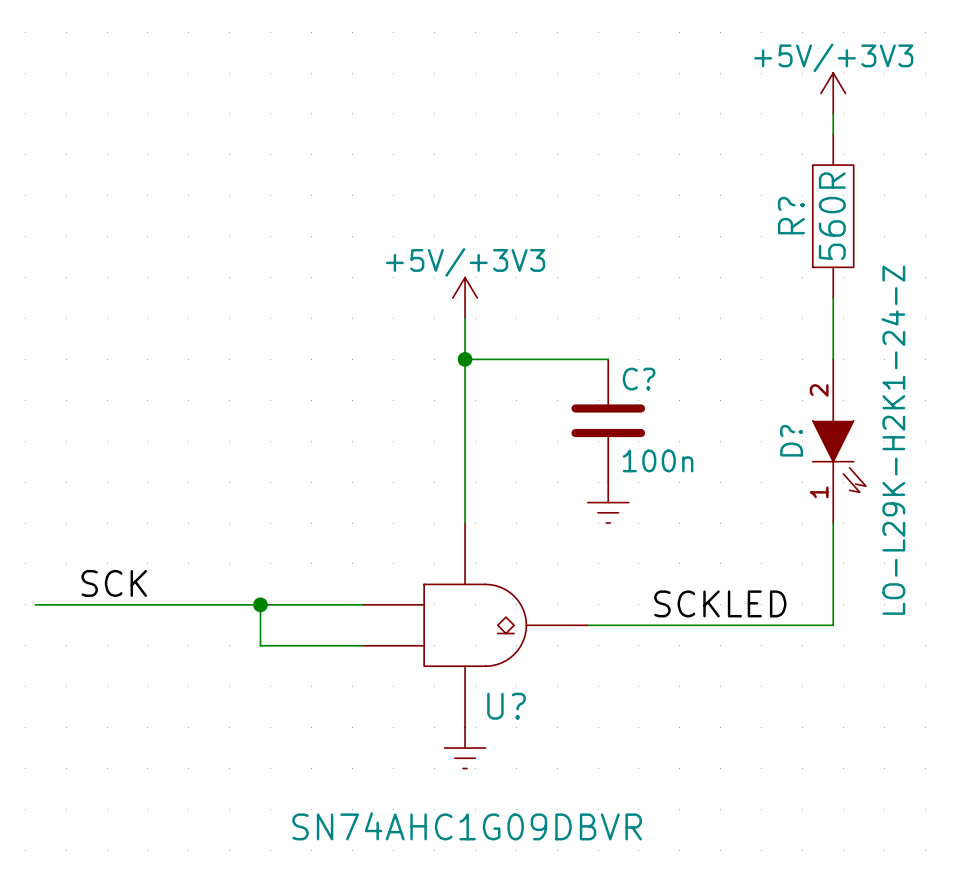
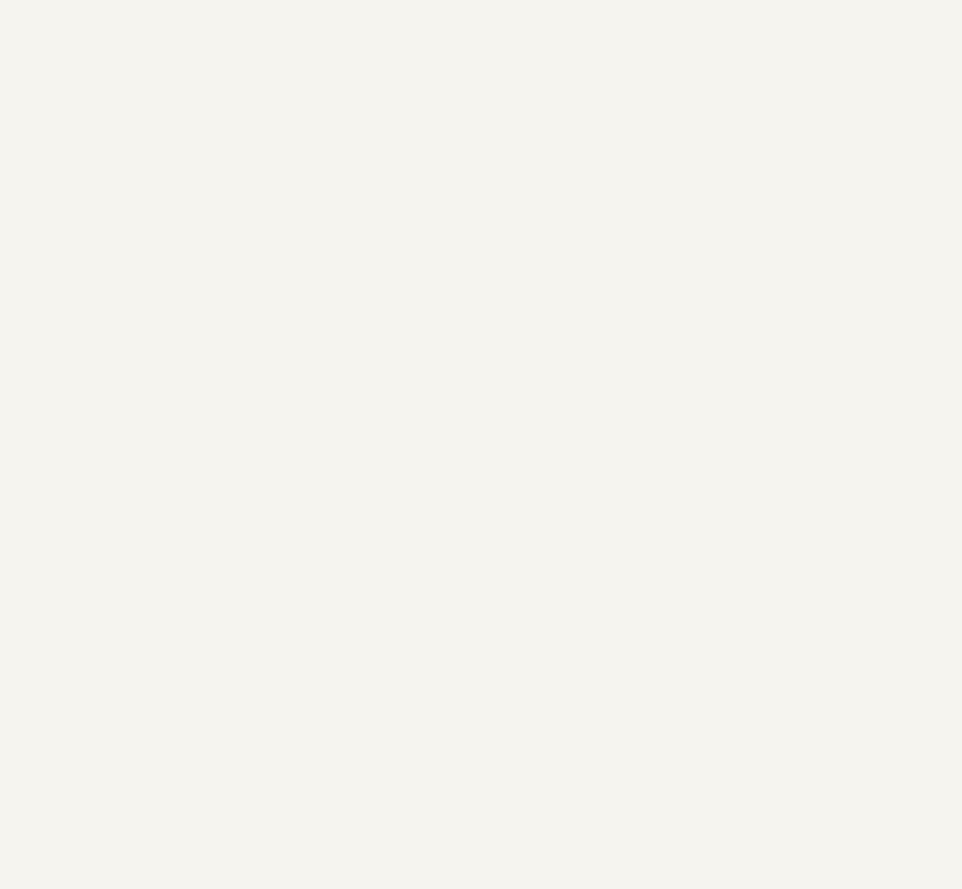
power symbol: +5V/+3V3 (833, 93) -> none
wire: (833, 113) (833, 134) -> none
R?: 560R (833, 216) -> none
power symbol: +5V/+3V3 (465, 298) -> none
wire: (833, 298) (833, 359) -> none
wire: (465, 318) (465, 523) -> none
wire: (465, 359) (608, 359) -> none
junction: (465, 359) -> none
C?: 100n (608, 420) -> none
D?: LO-L29K-H2K1-24-Z (839, 441) -> none
power symbol: (608, 502) -> none
wire: (833, 523) (833, 625) (587, 625) -> none
label: SCK (114, 583) -> none
label: SCKLED (720, 603) -> none
wire: (35, 604) (362, 604) -> none
wire: (260, 604) (260, 645) (362, 645) -> none
junction: (260, 604) -> none
U?: SN74AHC1G09DBVR (475, 625) -> none
power symbol: (465, 748) -> none

